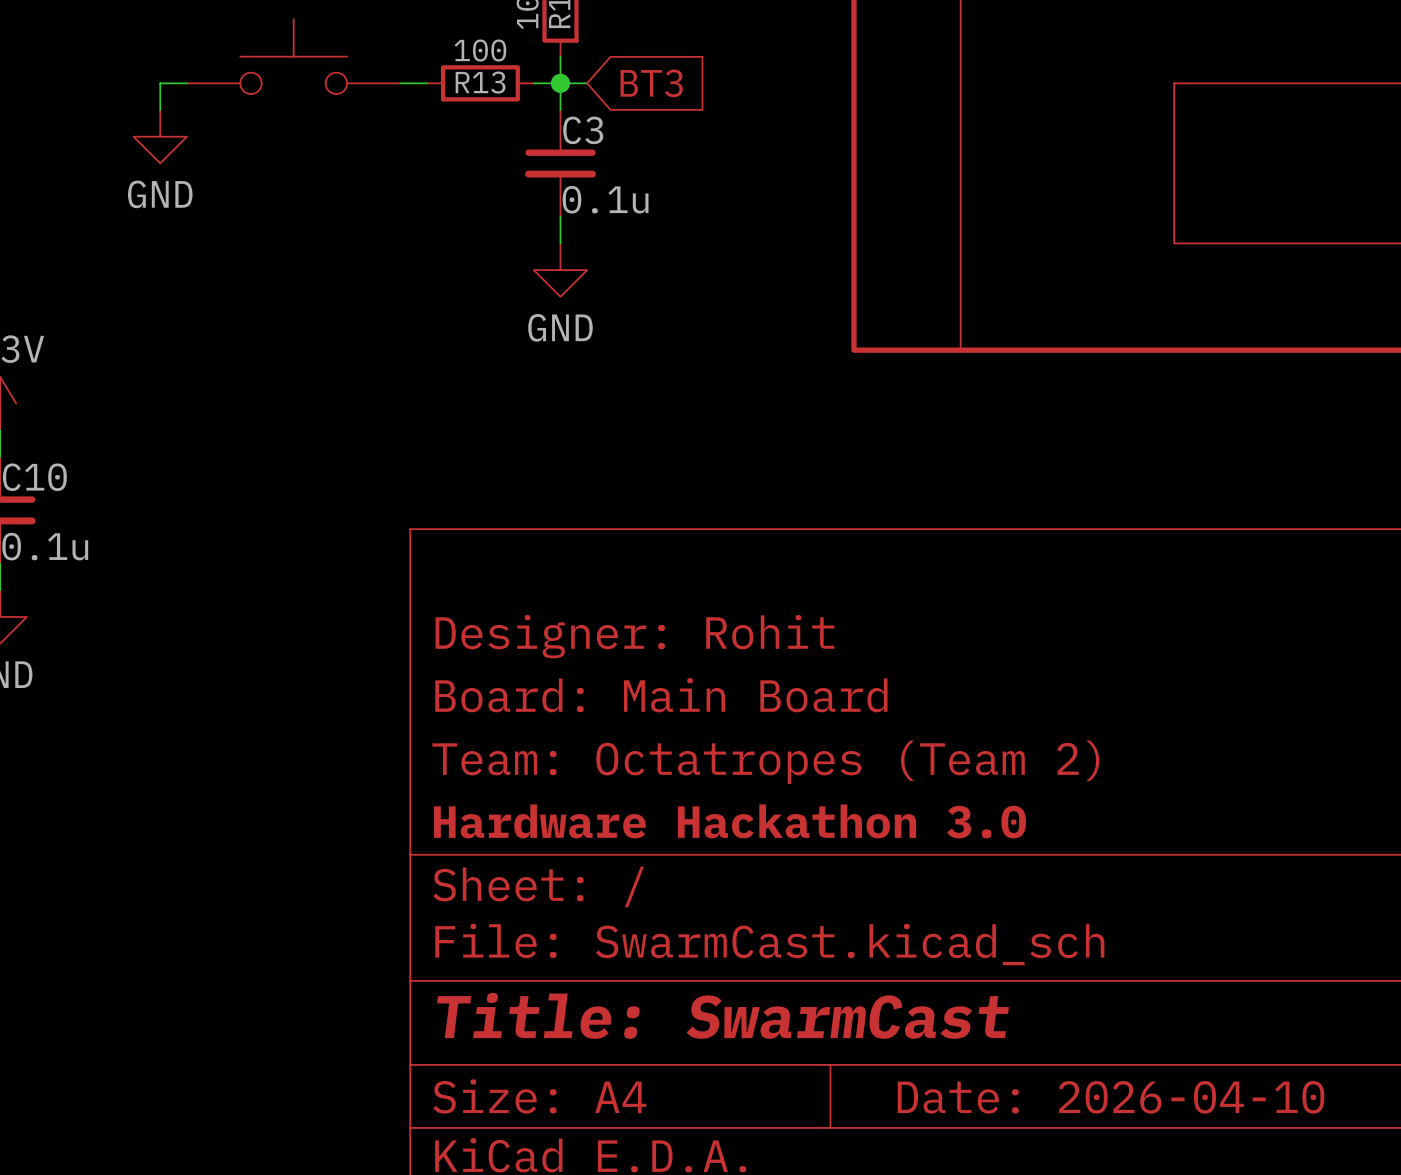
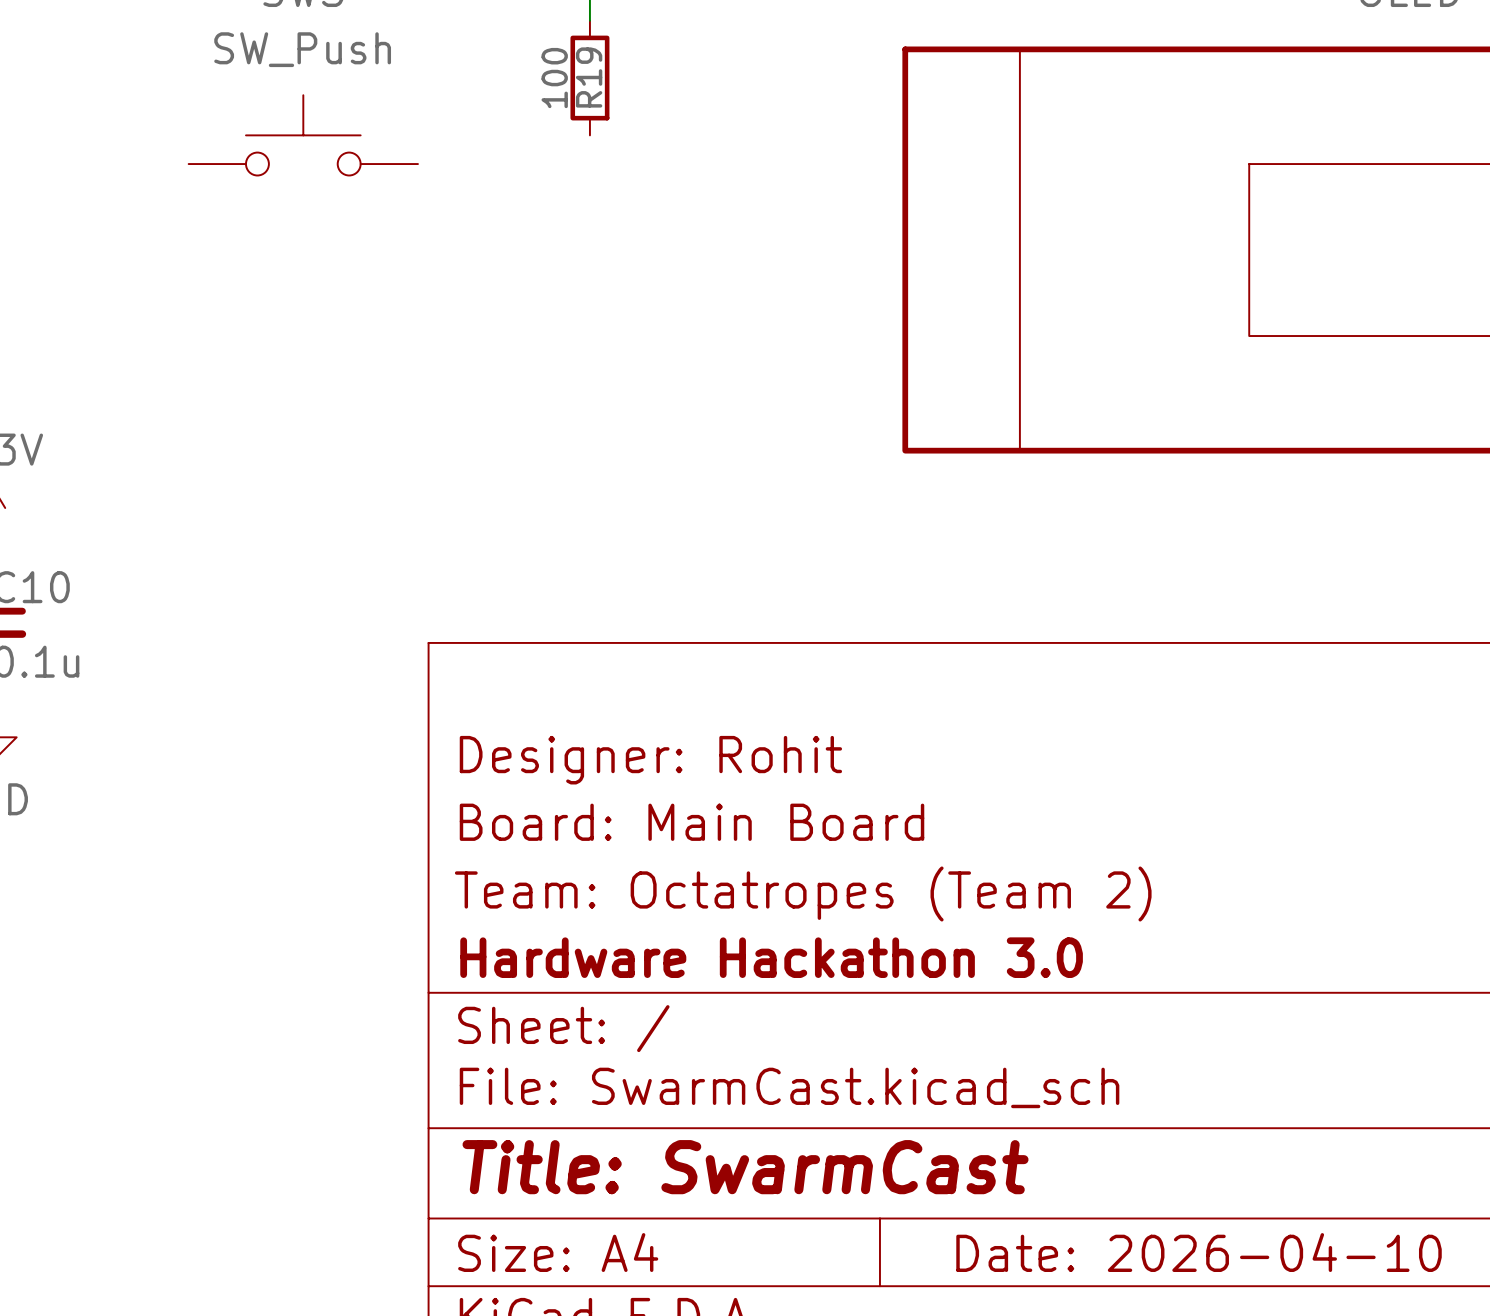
wire: (560, 56) (560, 110) -> none
wire: (186, 83) (160, 83) (160, 110) -> none
wire: (400, 83) (427, 83) -> none
R13: 100 (480, 83) -> none
wire: (533, 83) (587, 83) -> none
junction: (560, 83) -> none
global label: BT3 (651, 83) -> none
power symbol: GND (160, 136) -> none
C3: 0.1u (560, 163) -> none
wire: (560, 216) (560, 243) -> none
power symbol: GND (560, 270) -> none

